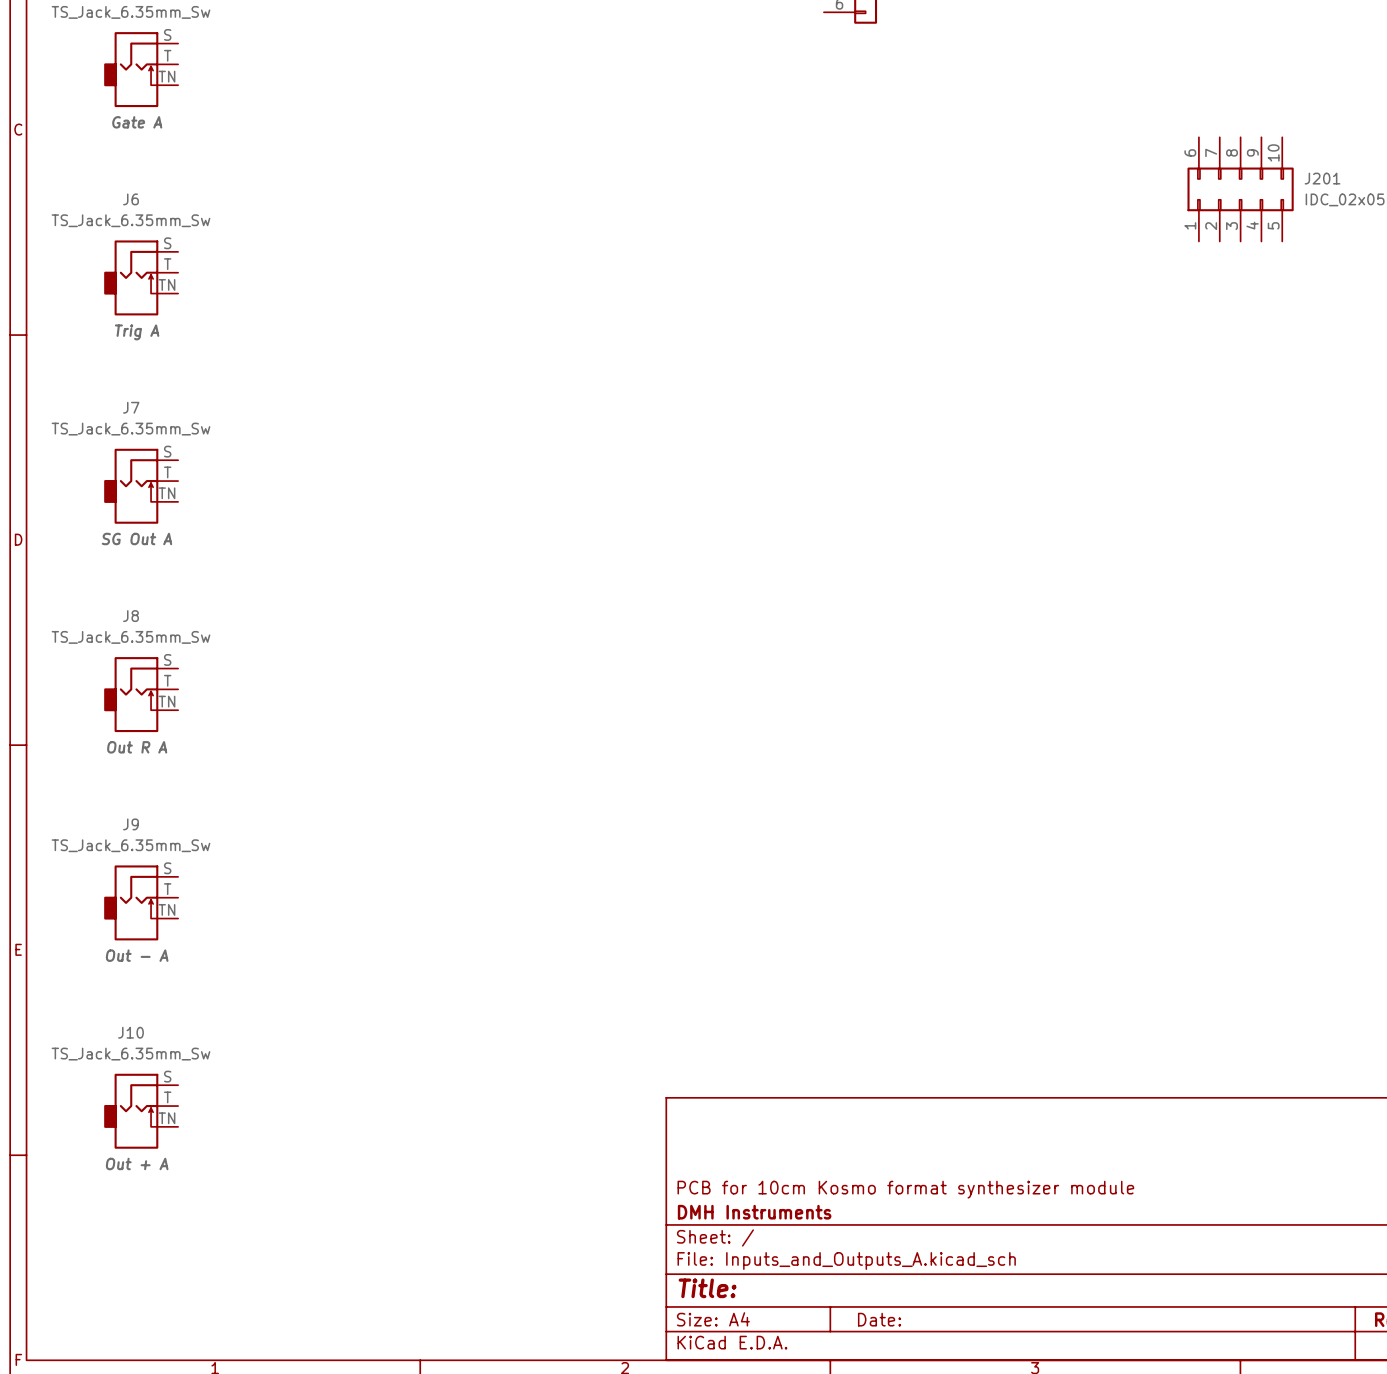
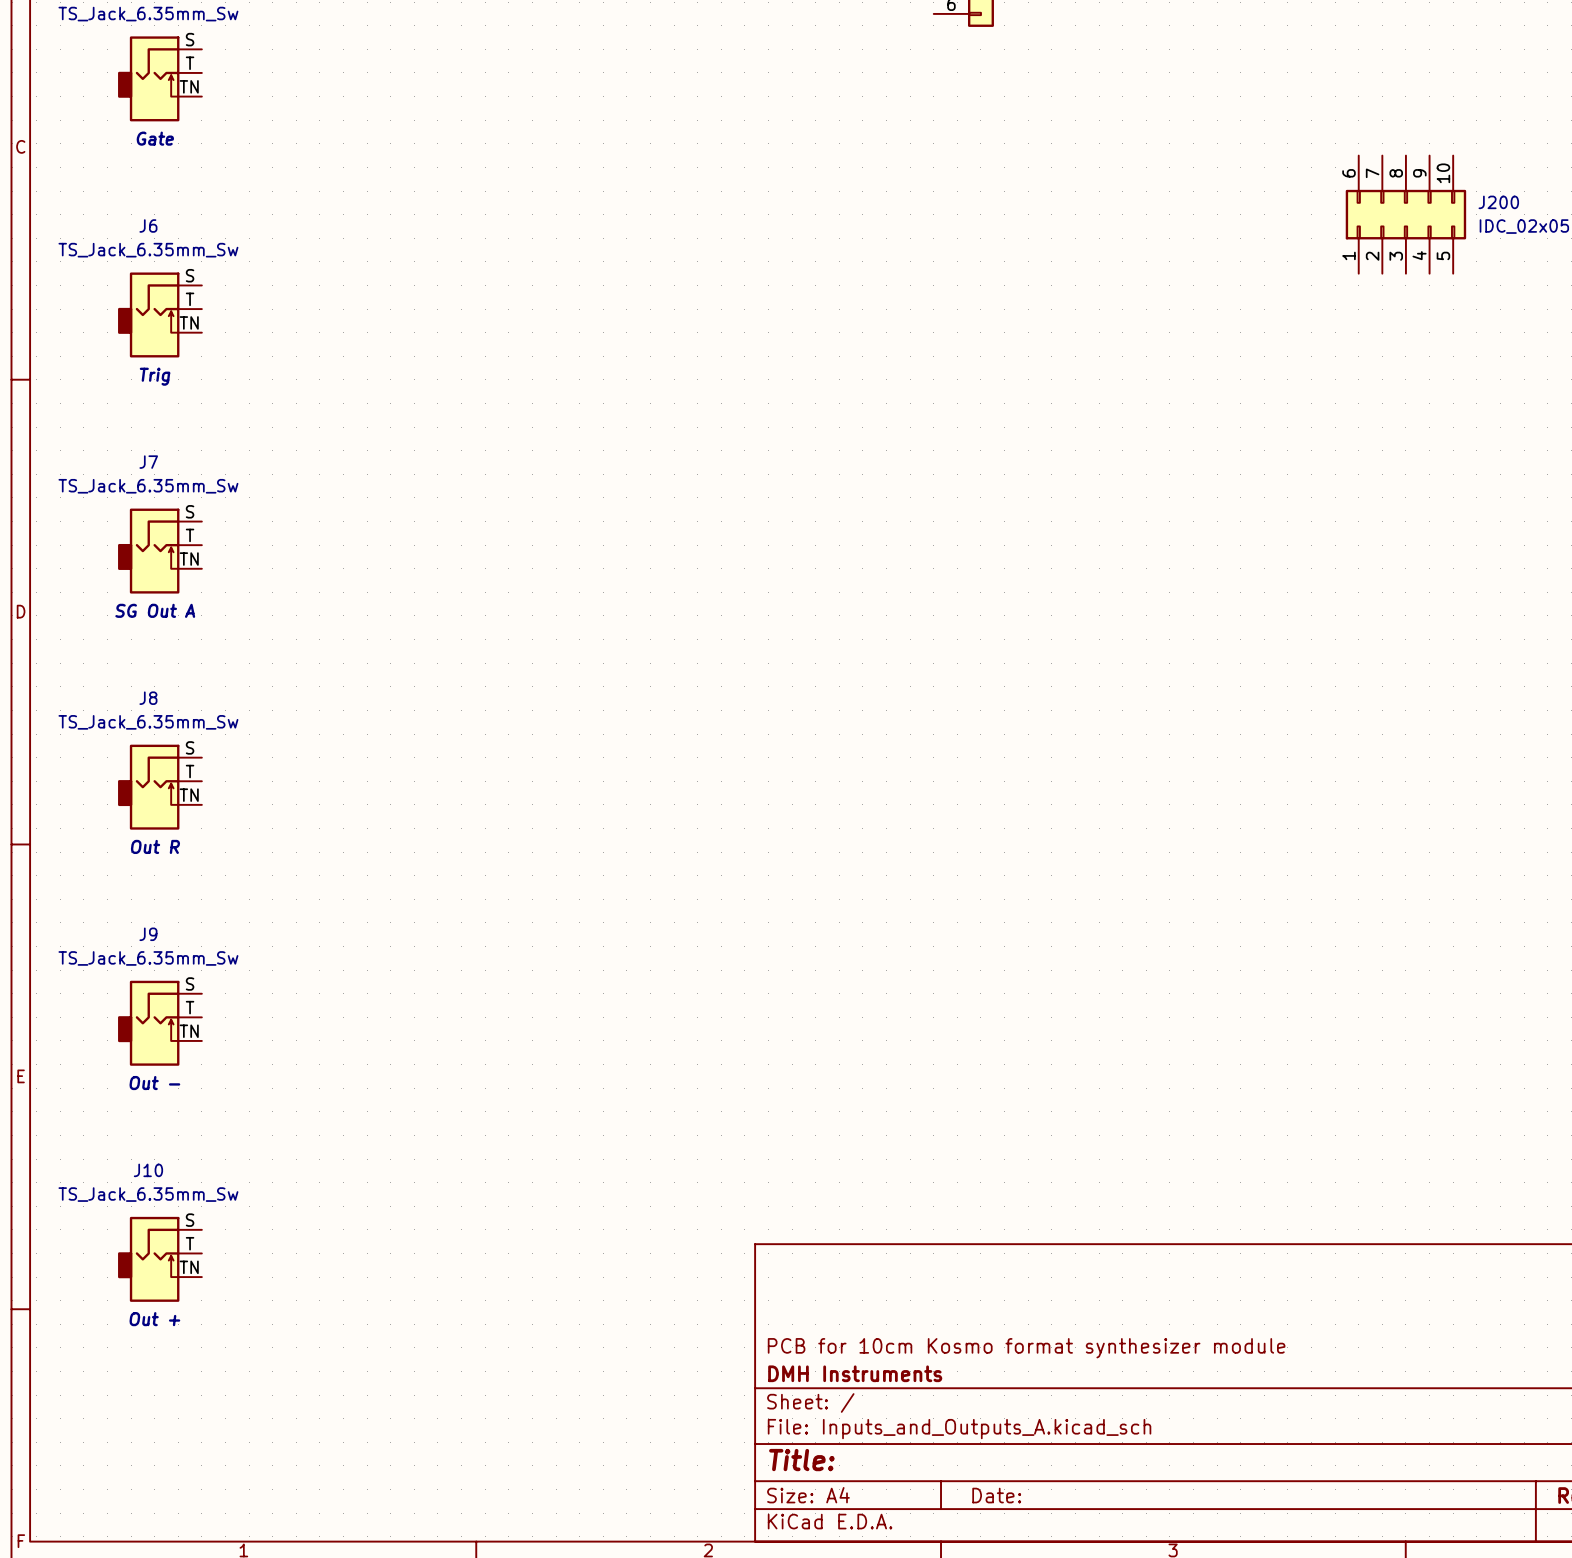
part text: Gate A (137, 122) -> Gate (155, 138)
J201 name: J201 (1322, 178) -> J200 (1498, 202)
J6 text: Trig A (137, 332) -> Trig (155, 376)
J8 text: Out R A (137, 747) -> Out R (155, 846)
J9 text: Out - A (137, 955) -> Out - (154, 1083)
J10 text: Out + A (137, 1163) -> Out + (154, 1319)

